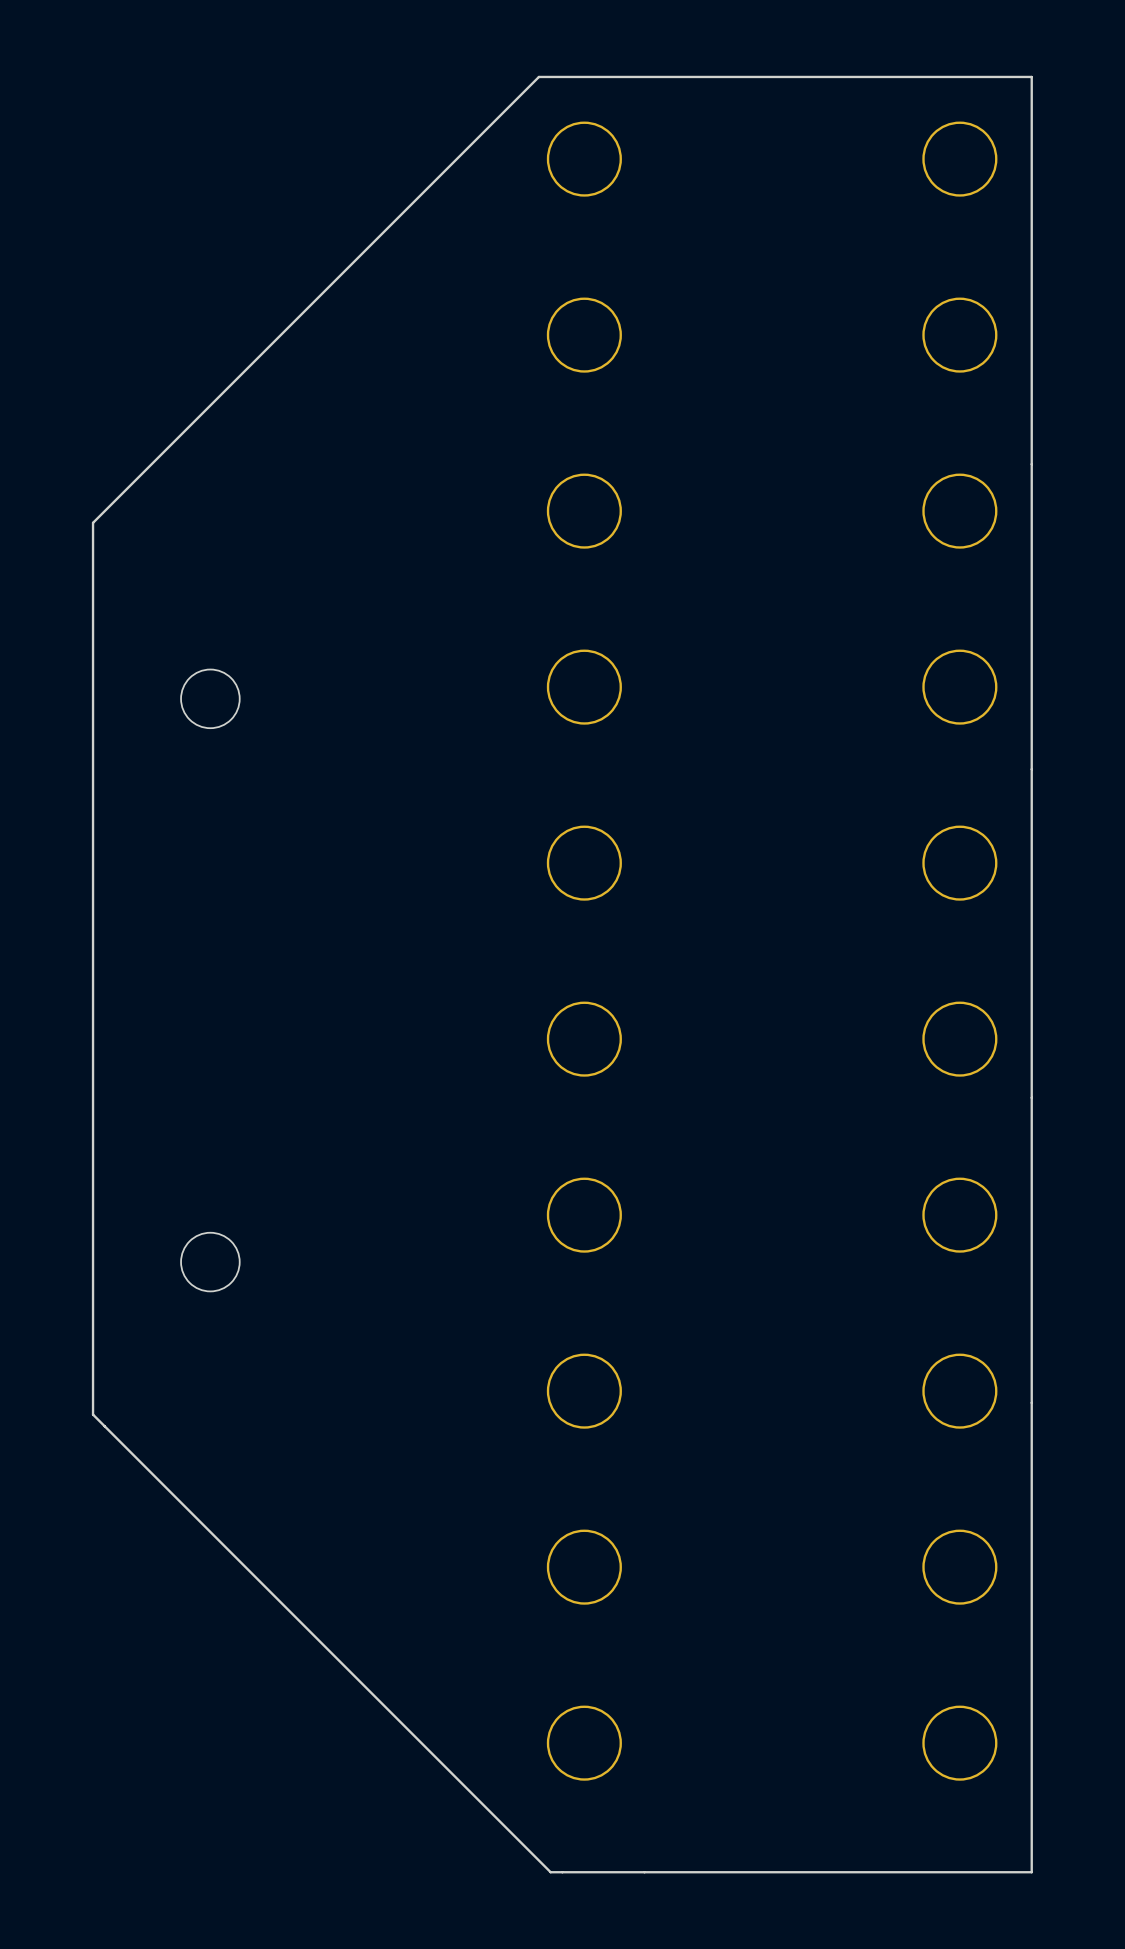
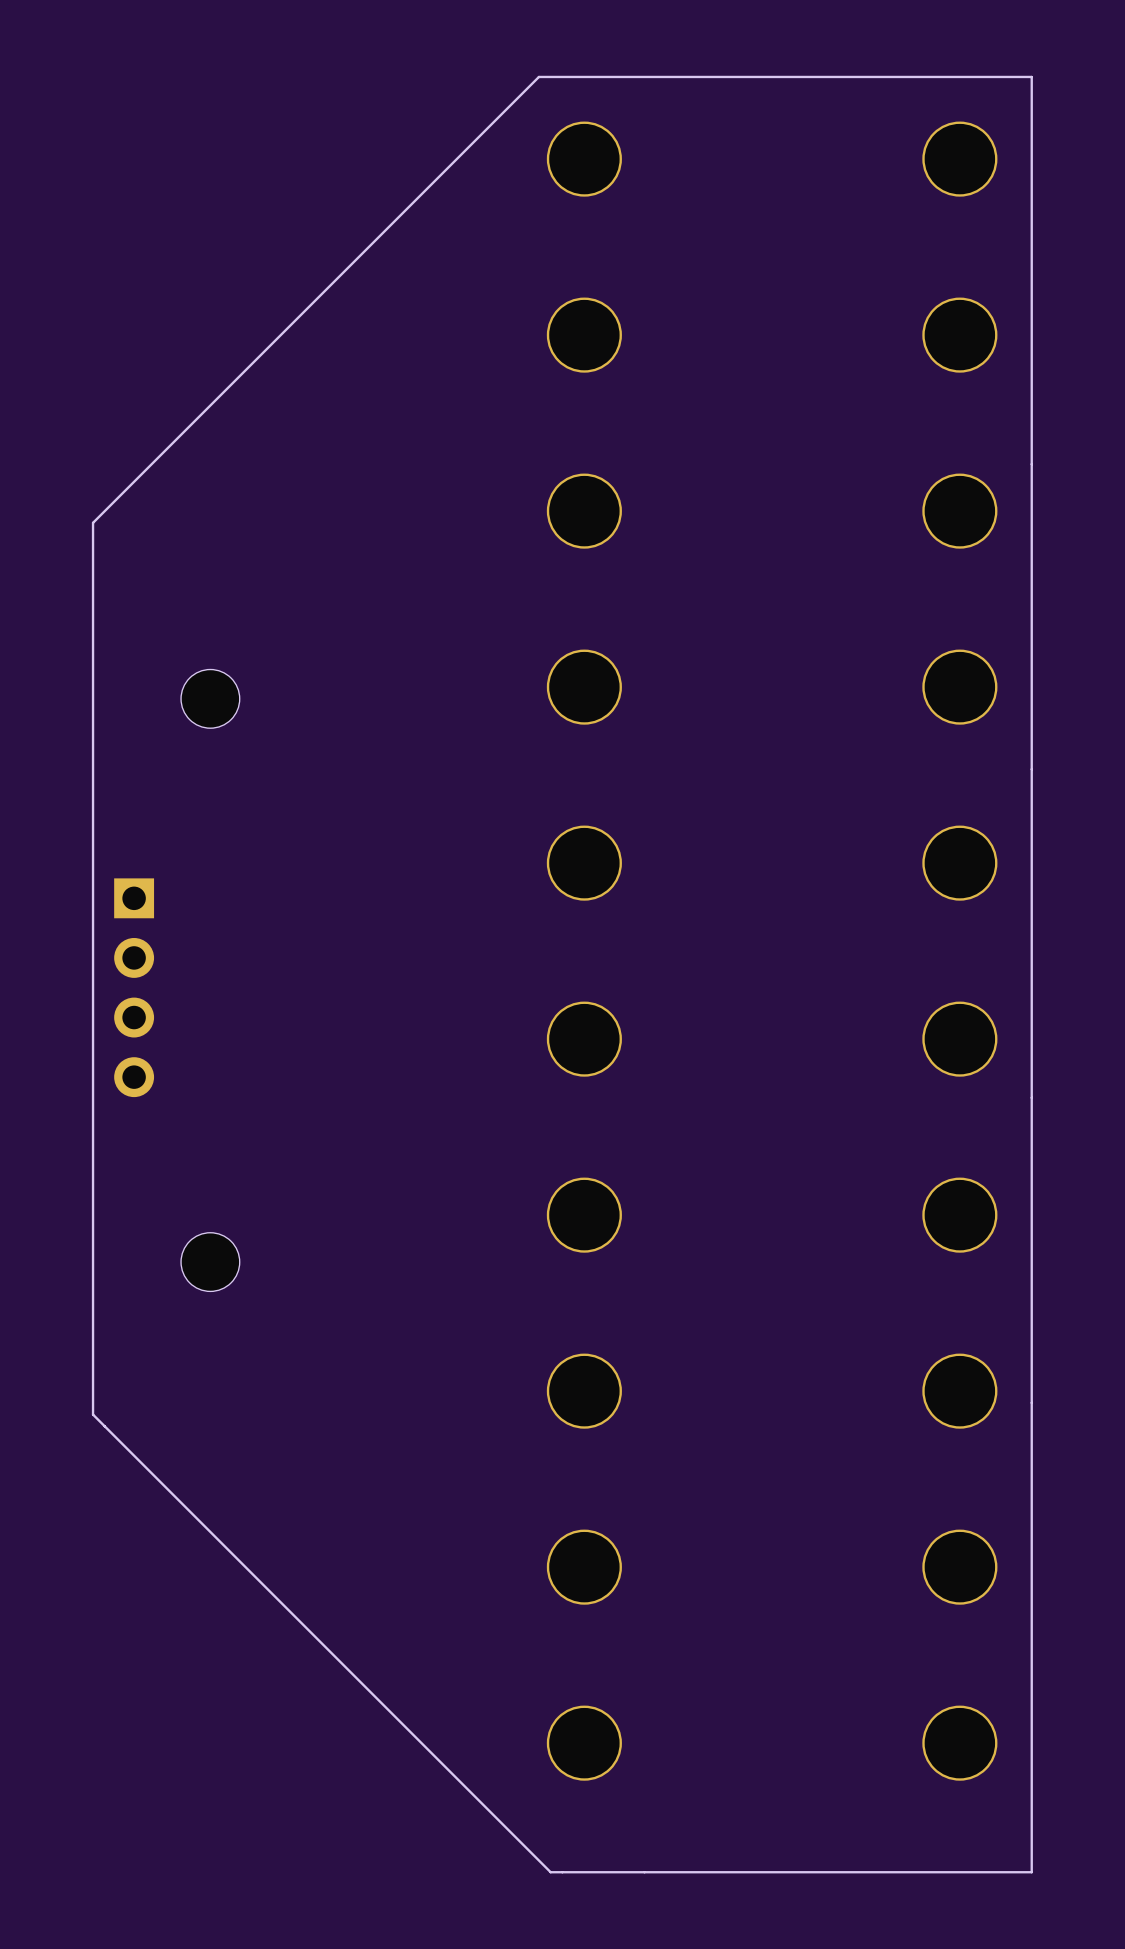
part: none -> (134, 987)

